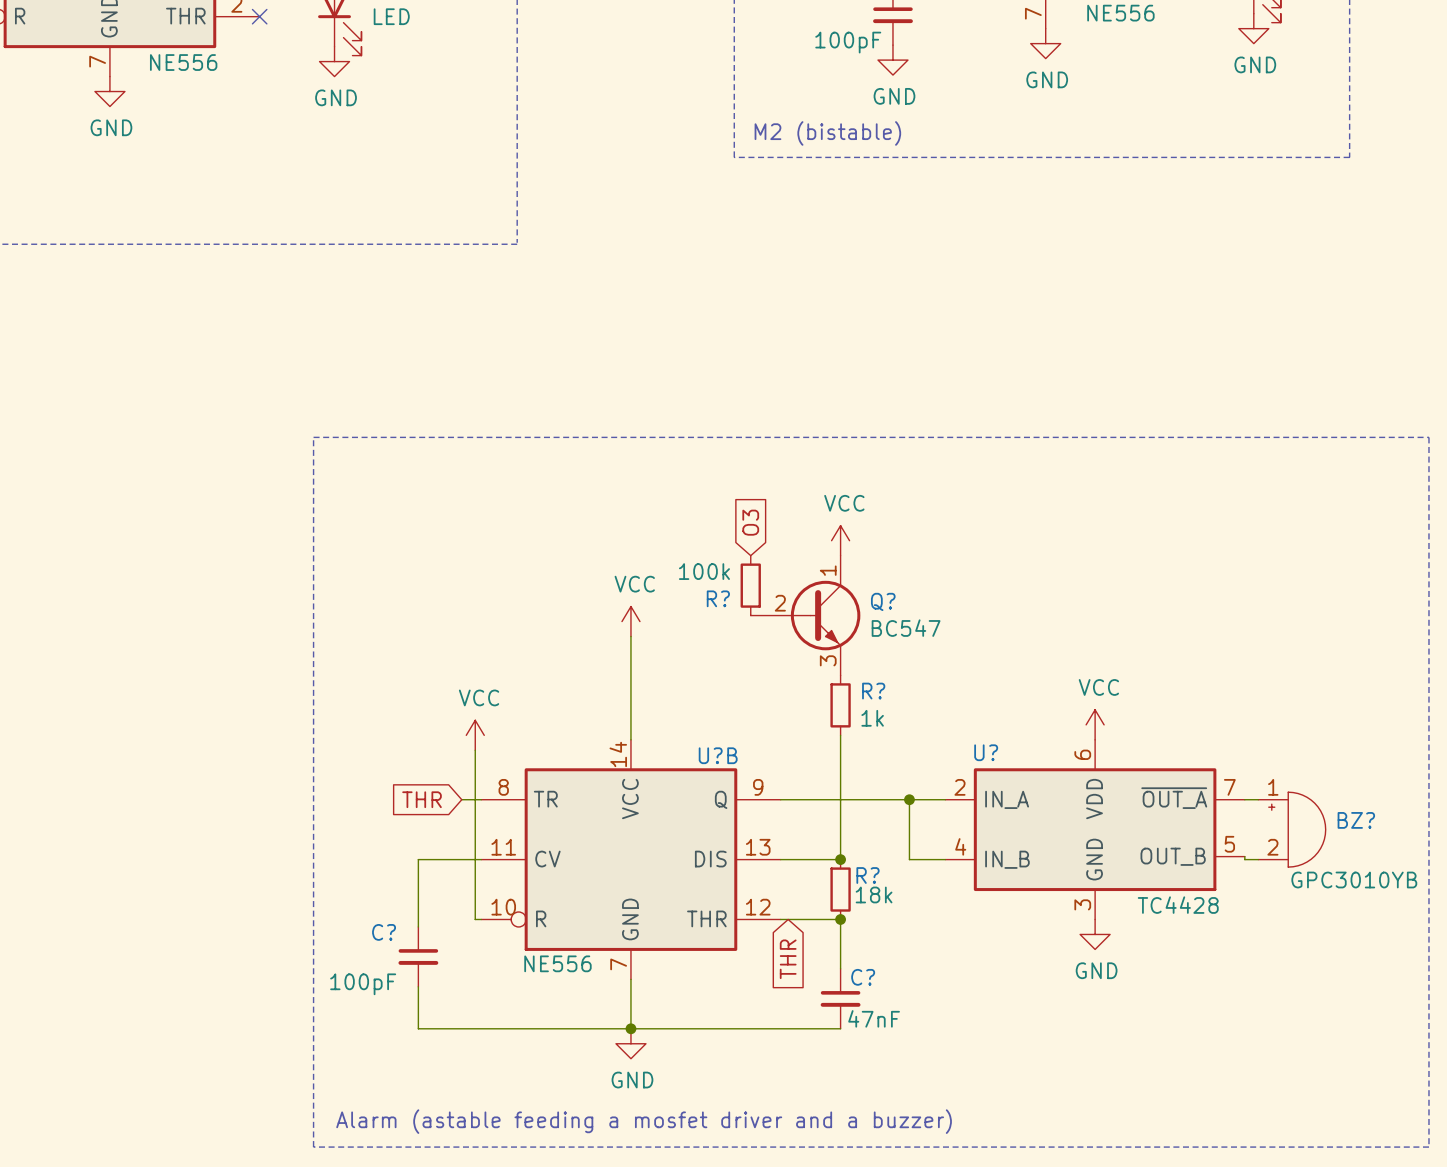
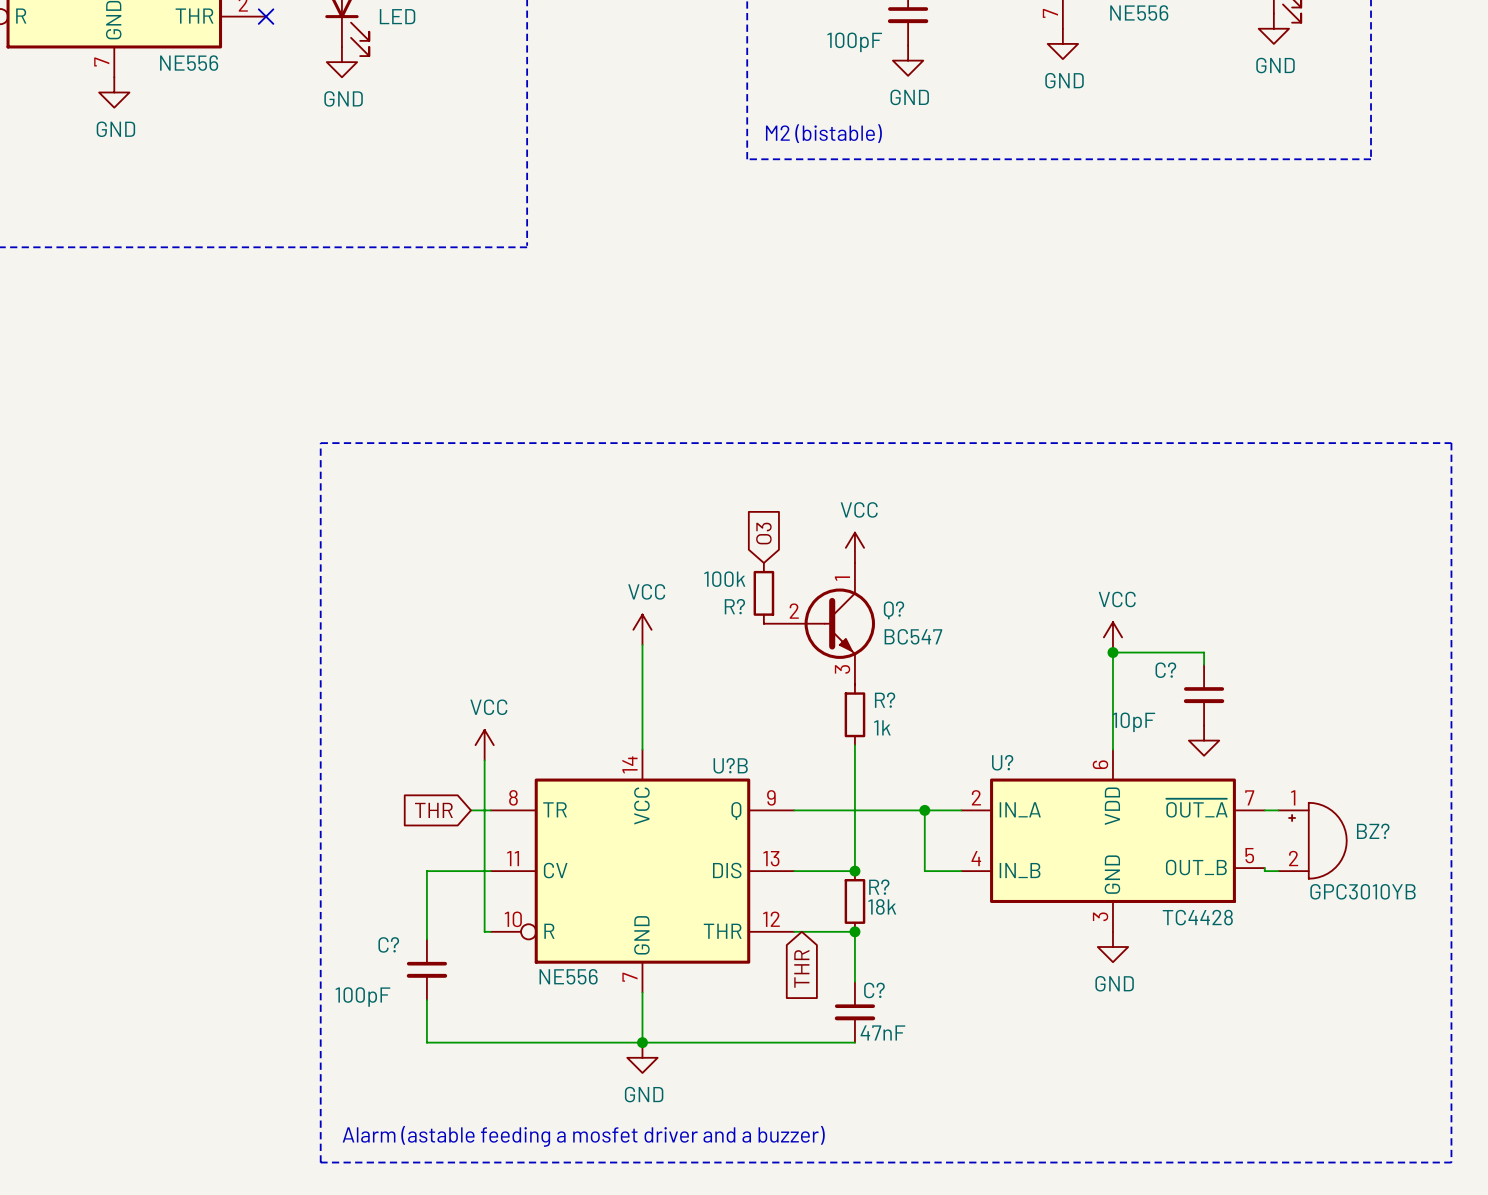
junction: none -> (1112, 652)
wire: none -> (1204, 664) (1204, 652) (1112, 652) (1112, 749)
C?: none -> 10pF (1204, 695)
power symbol position: VCC (1095, 724) -> VCC (1112, 637)
power symbol: none -> (1204, 740)

